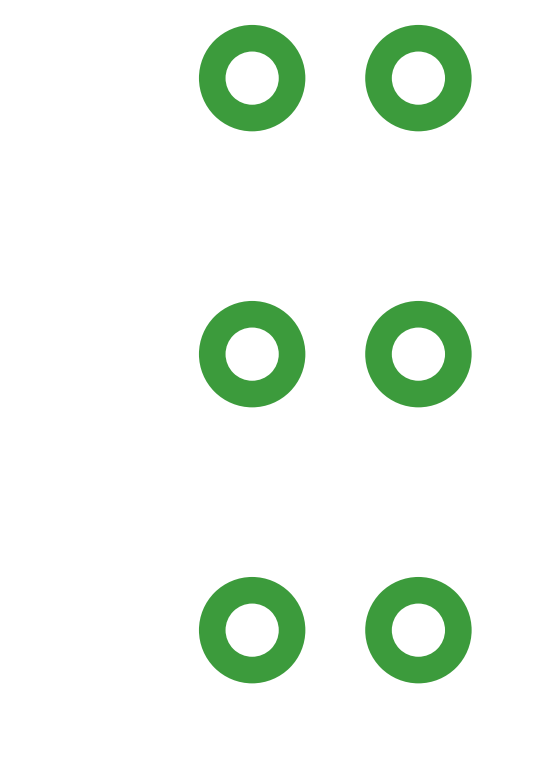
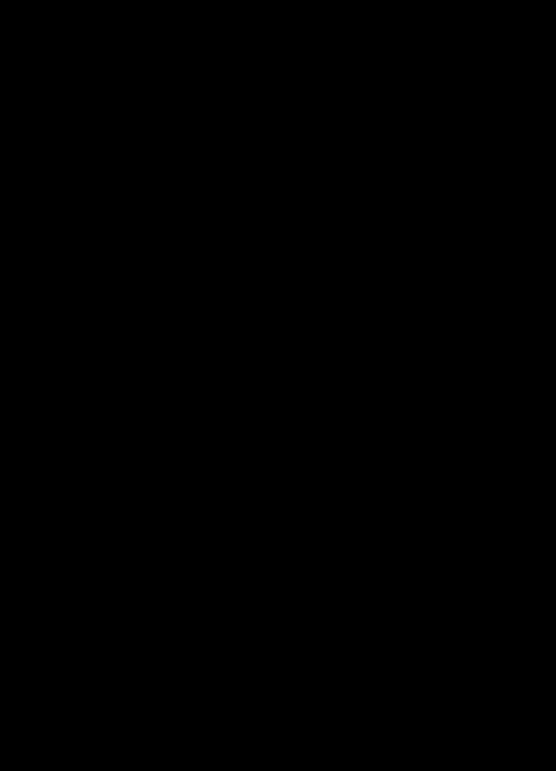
part: (335, 78) -> none
part: (335, 354) -> none
part: (335, 630) -> none

